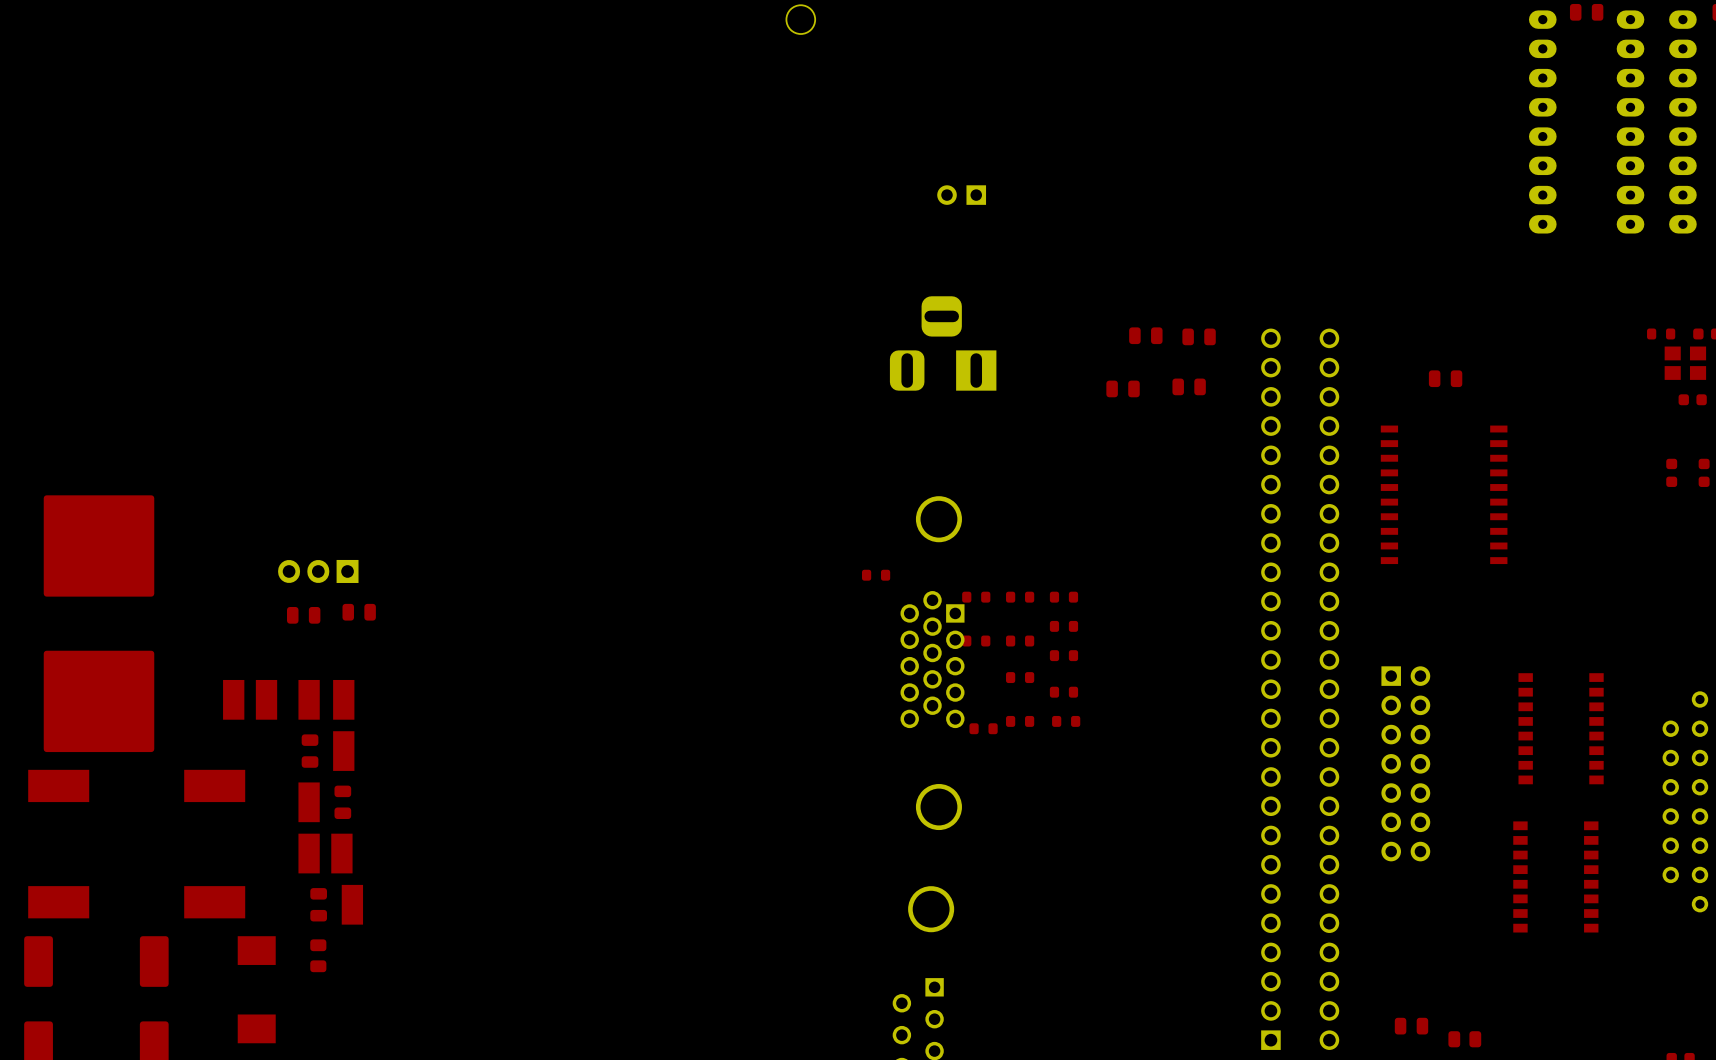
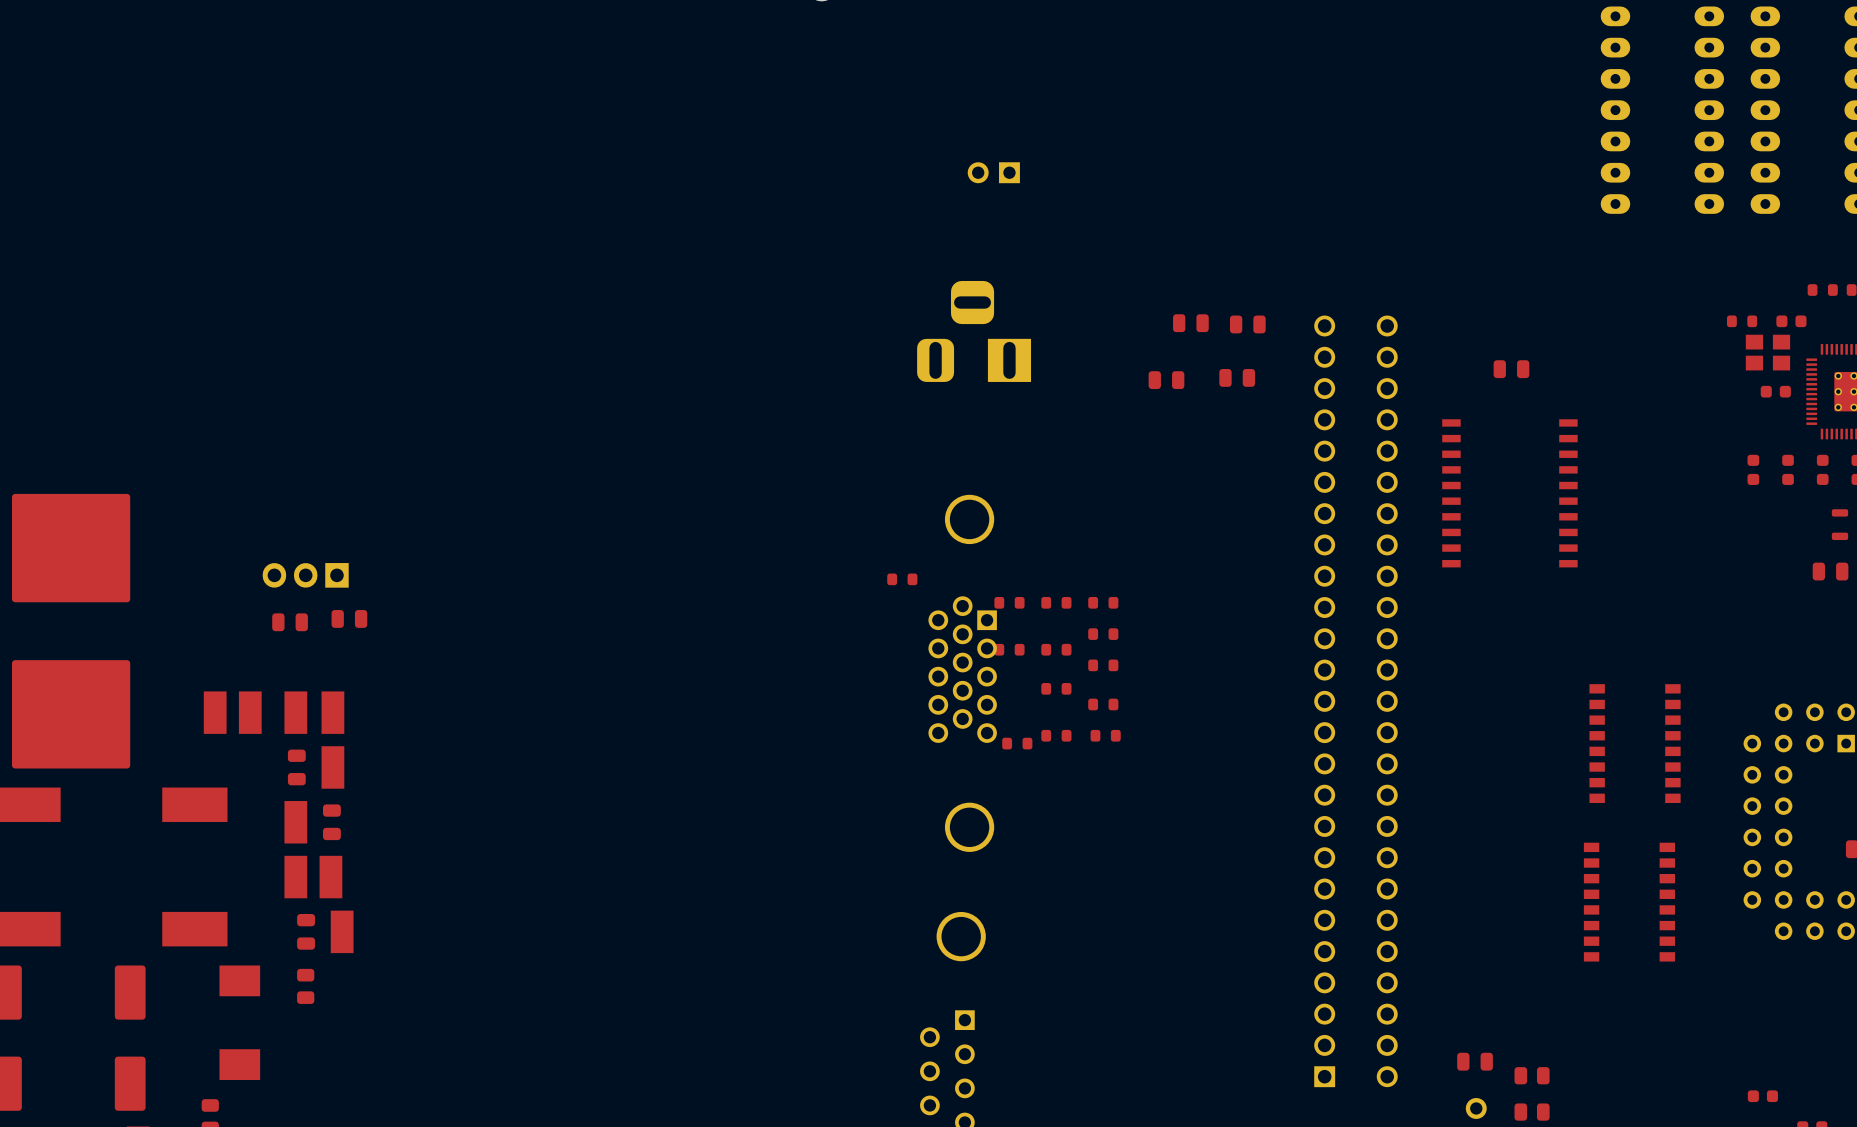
part: (1405, 763) -> none

